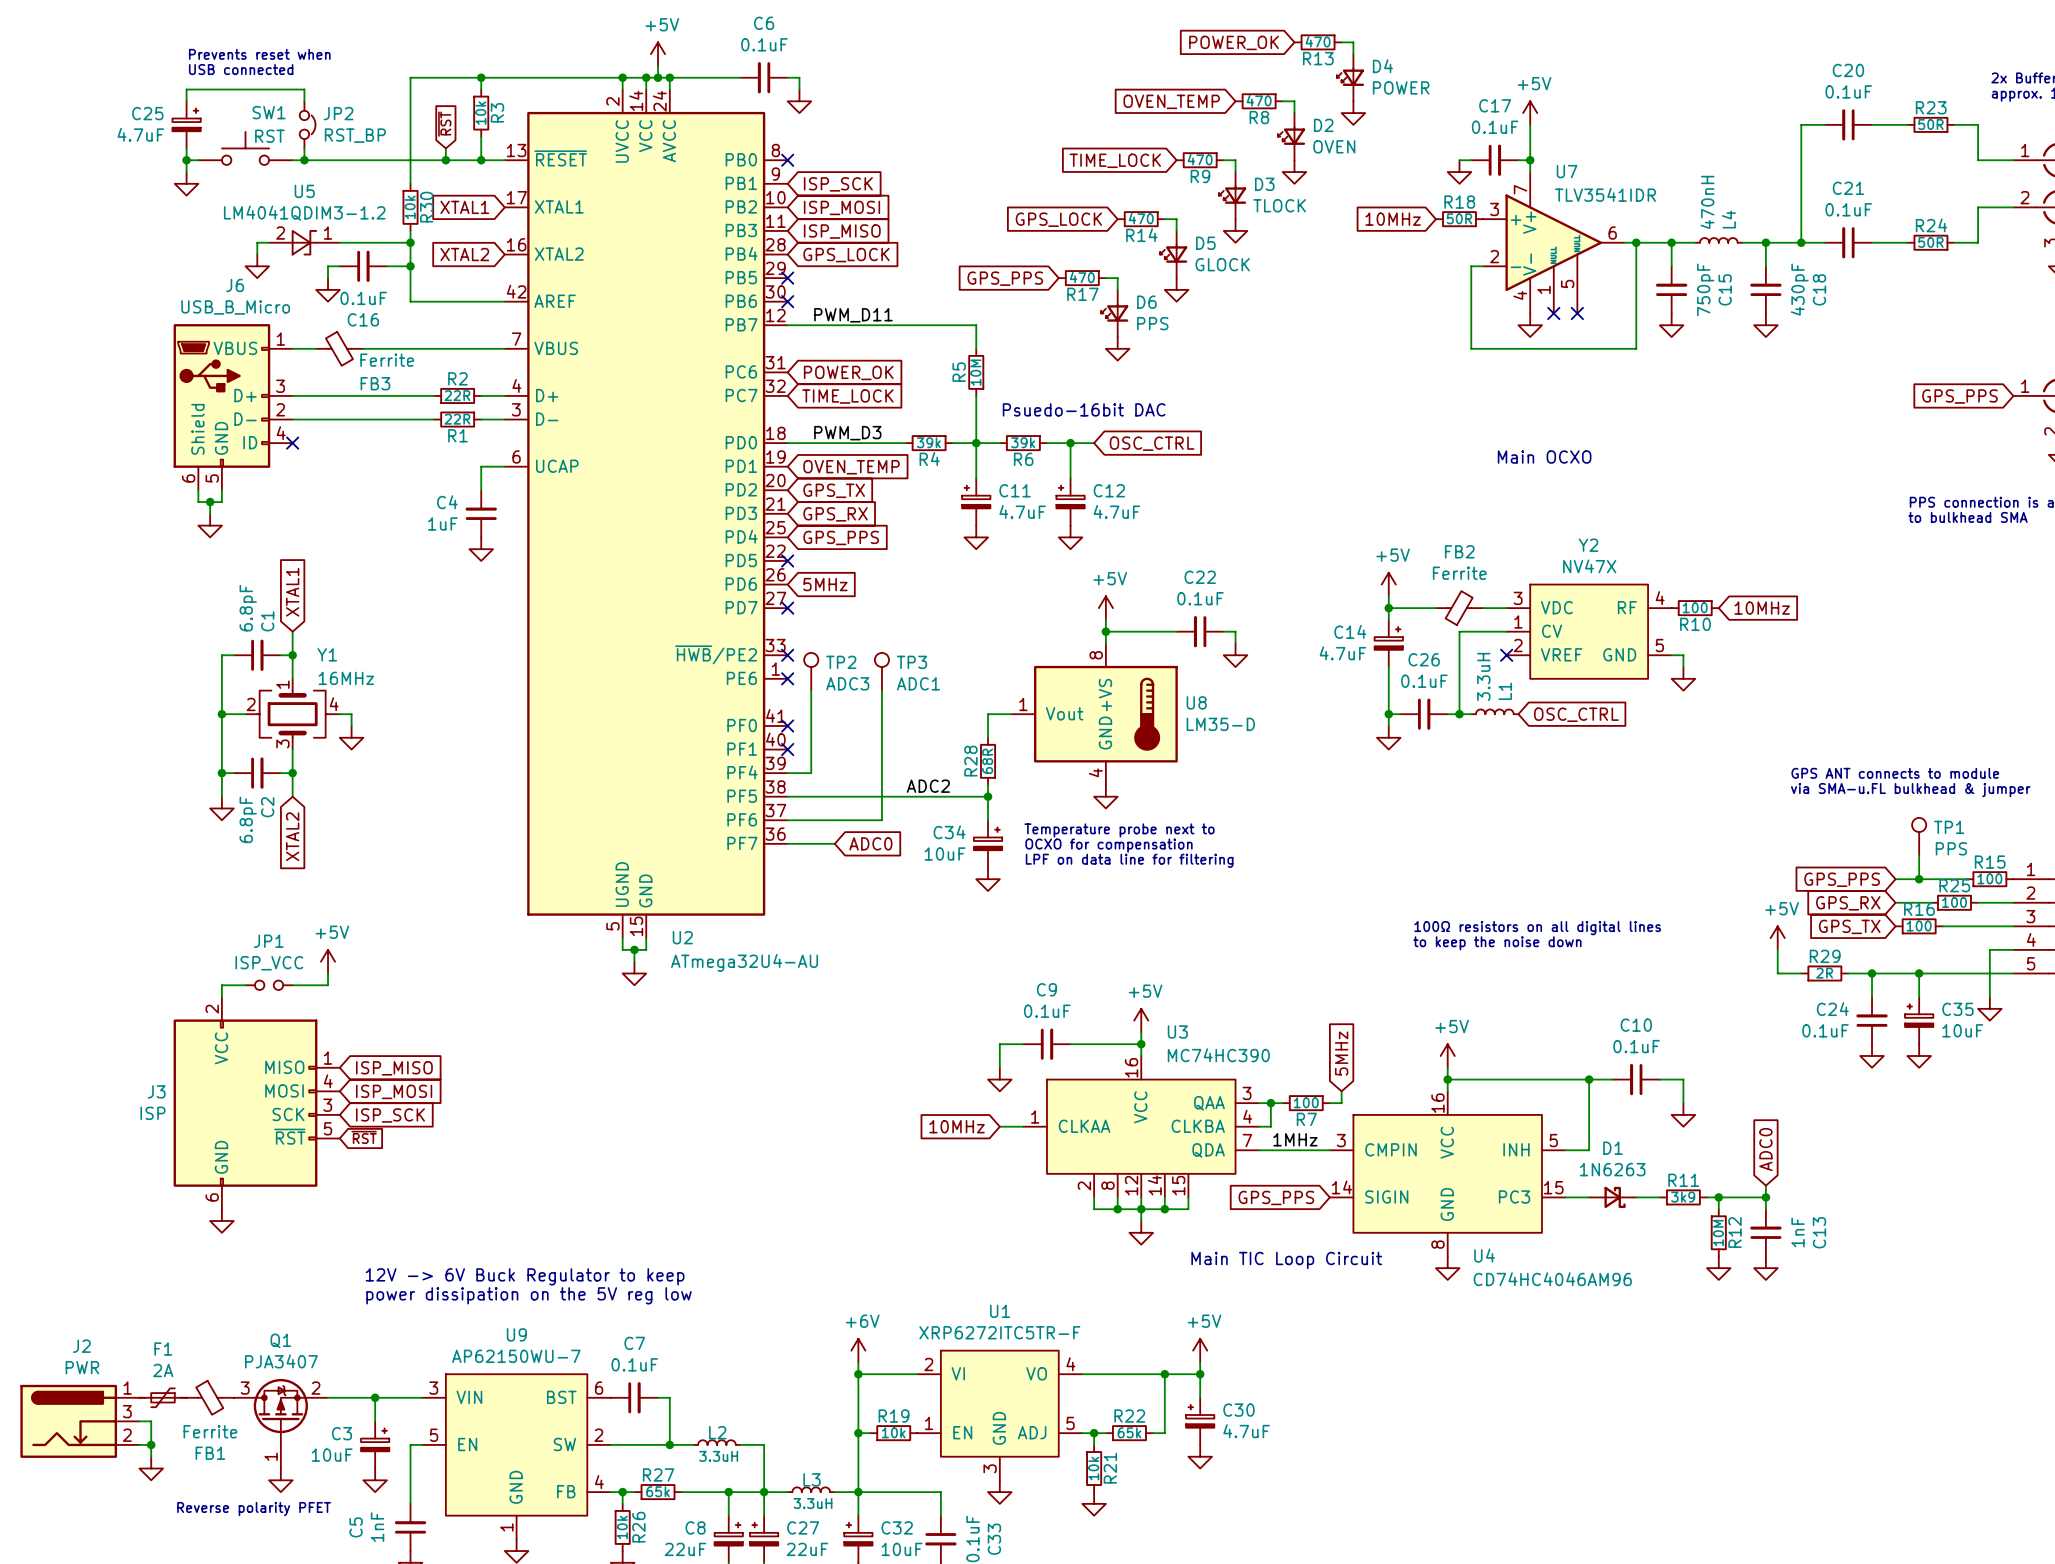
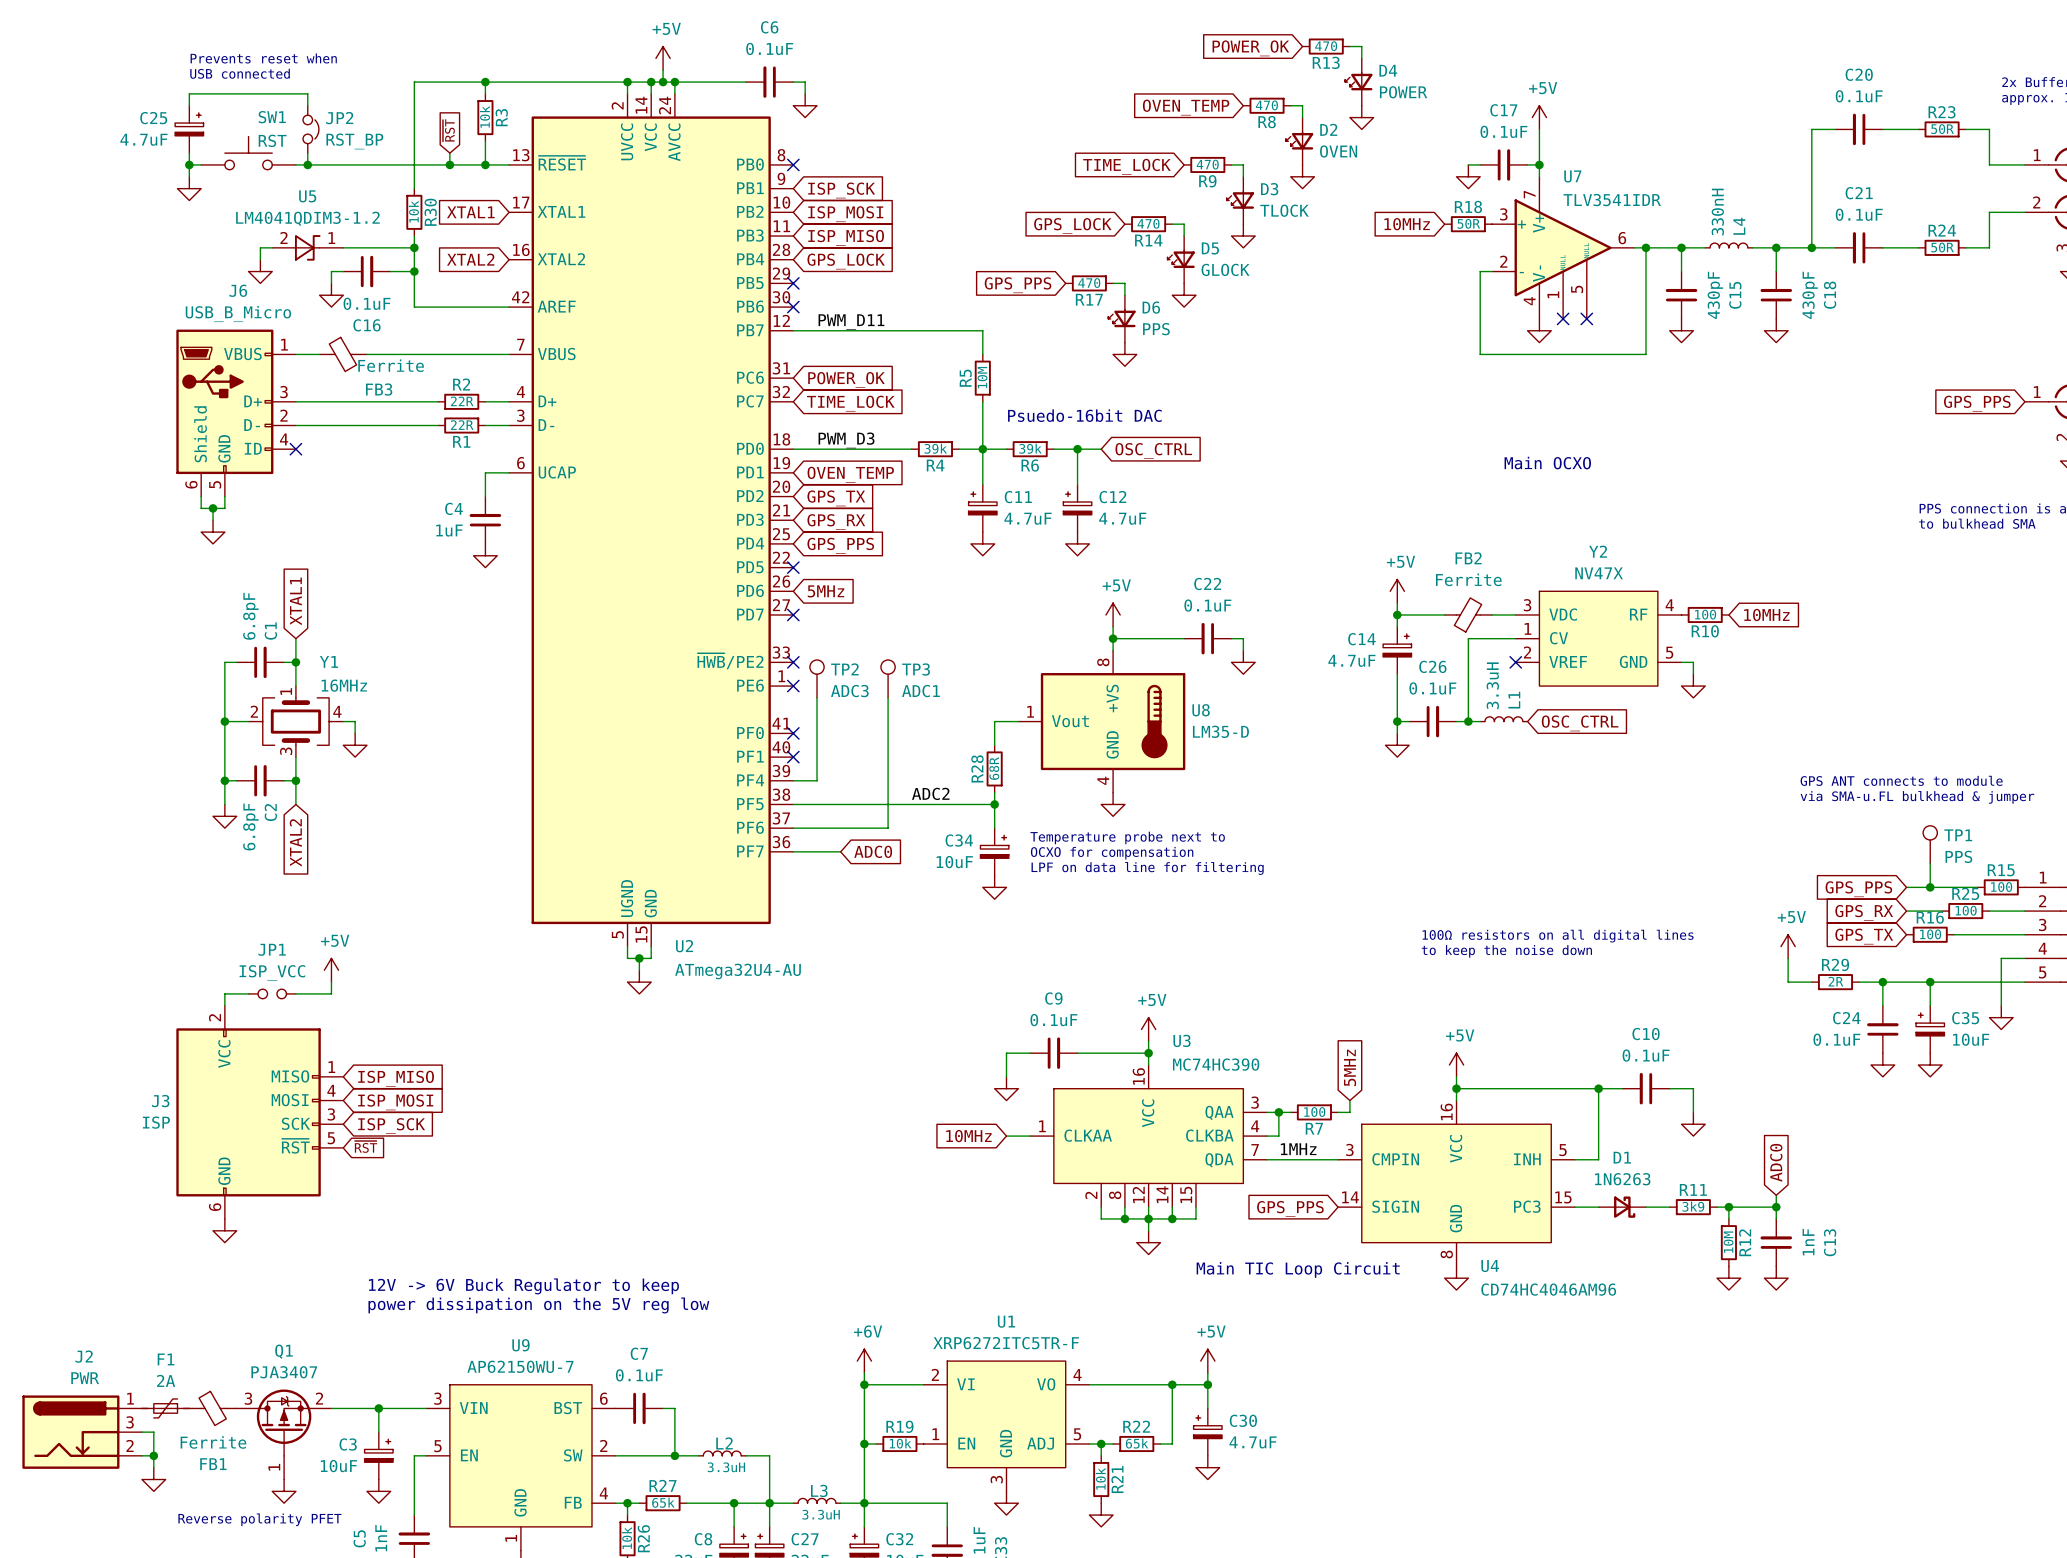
L4 value: 470nH (1707, 202) -> 330nH (1717, 212)
C15 value: 750pF (1705, 289) -> 430pF (1715, 295)

